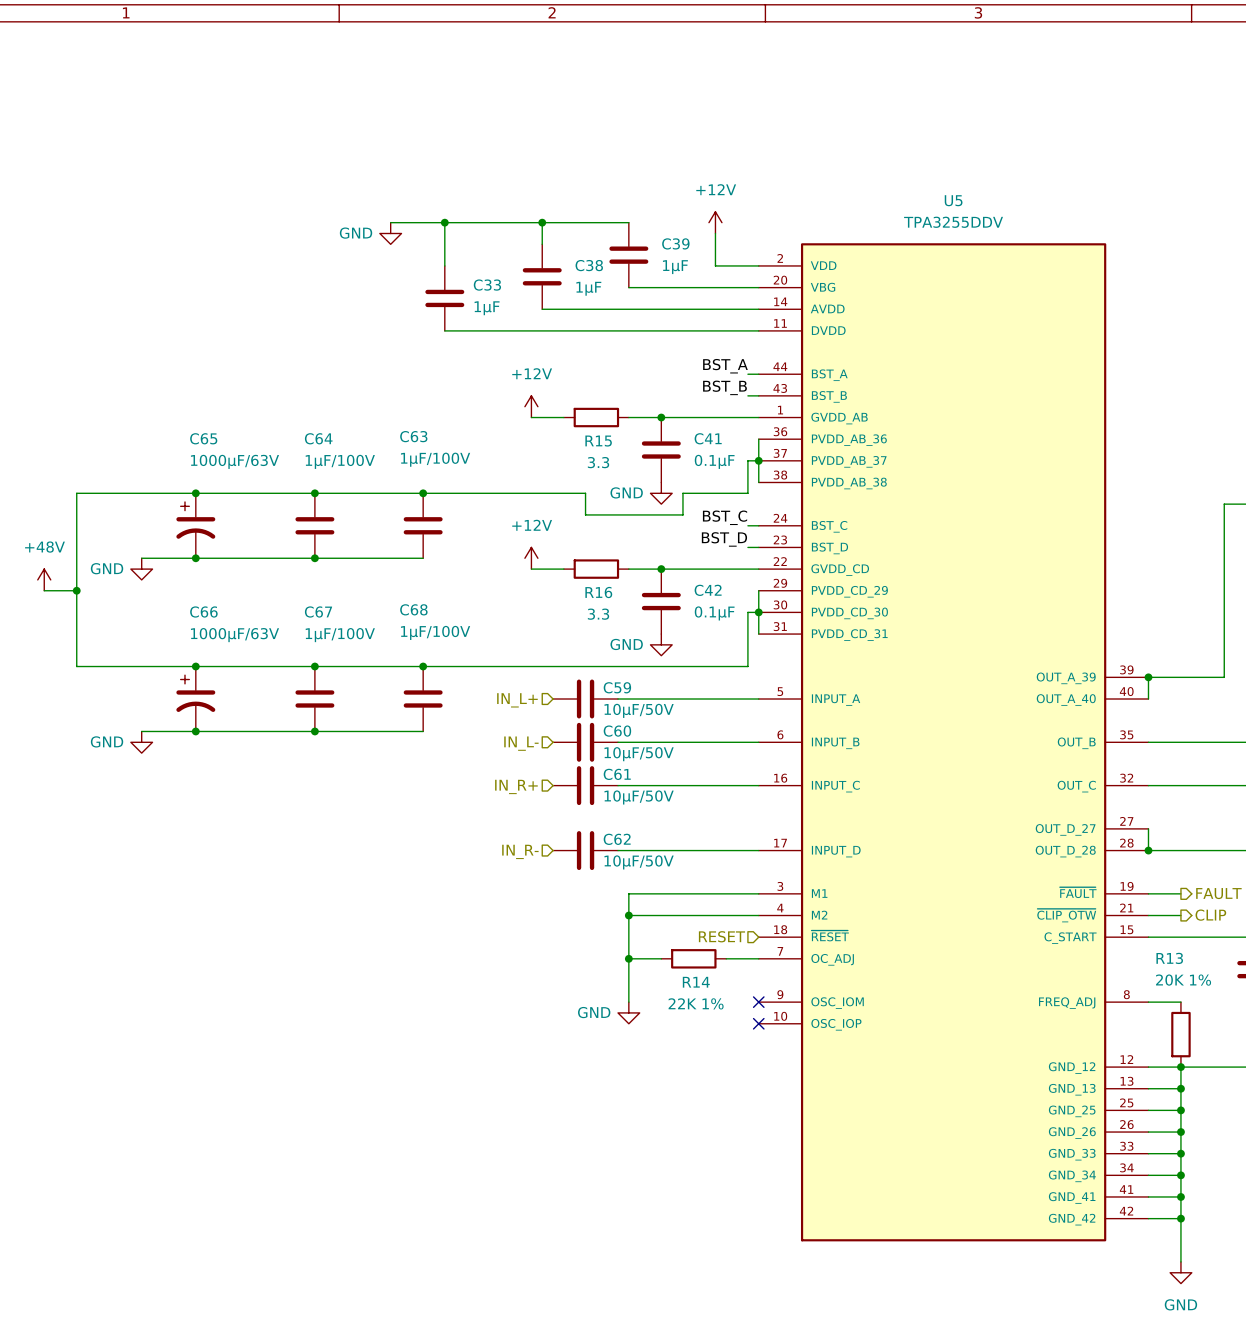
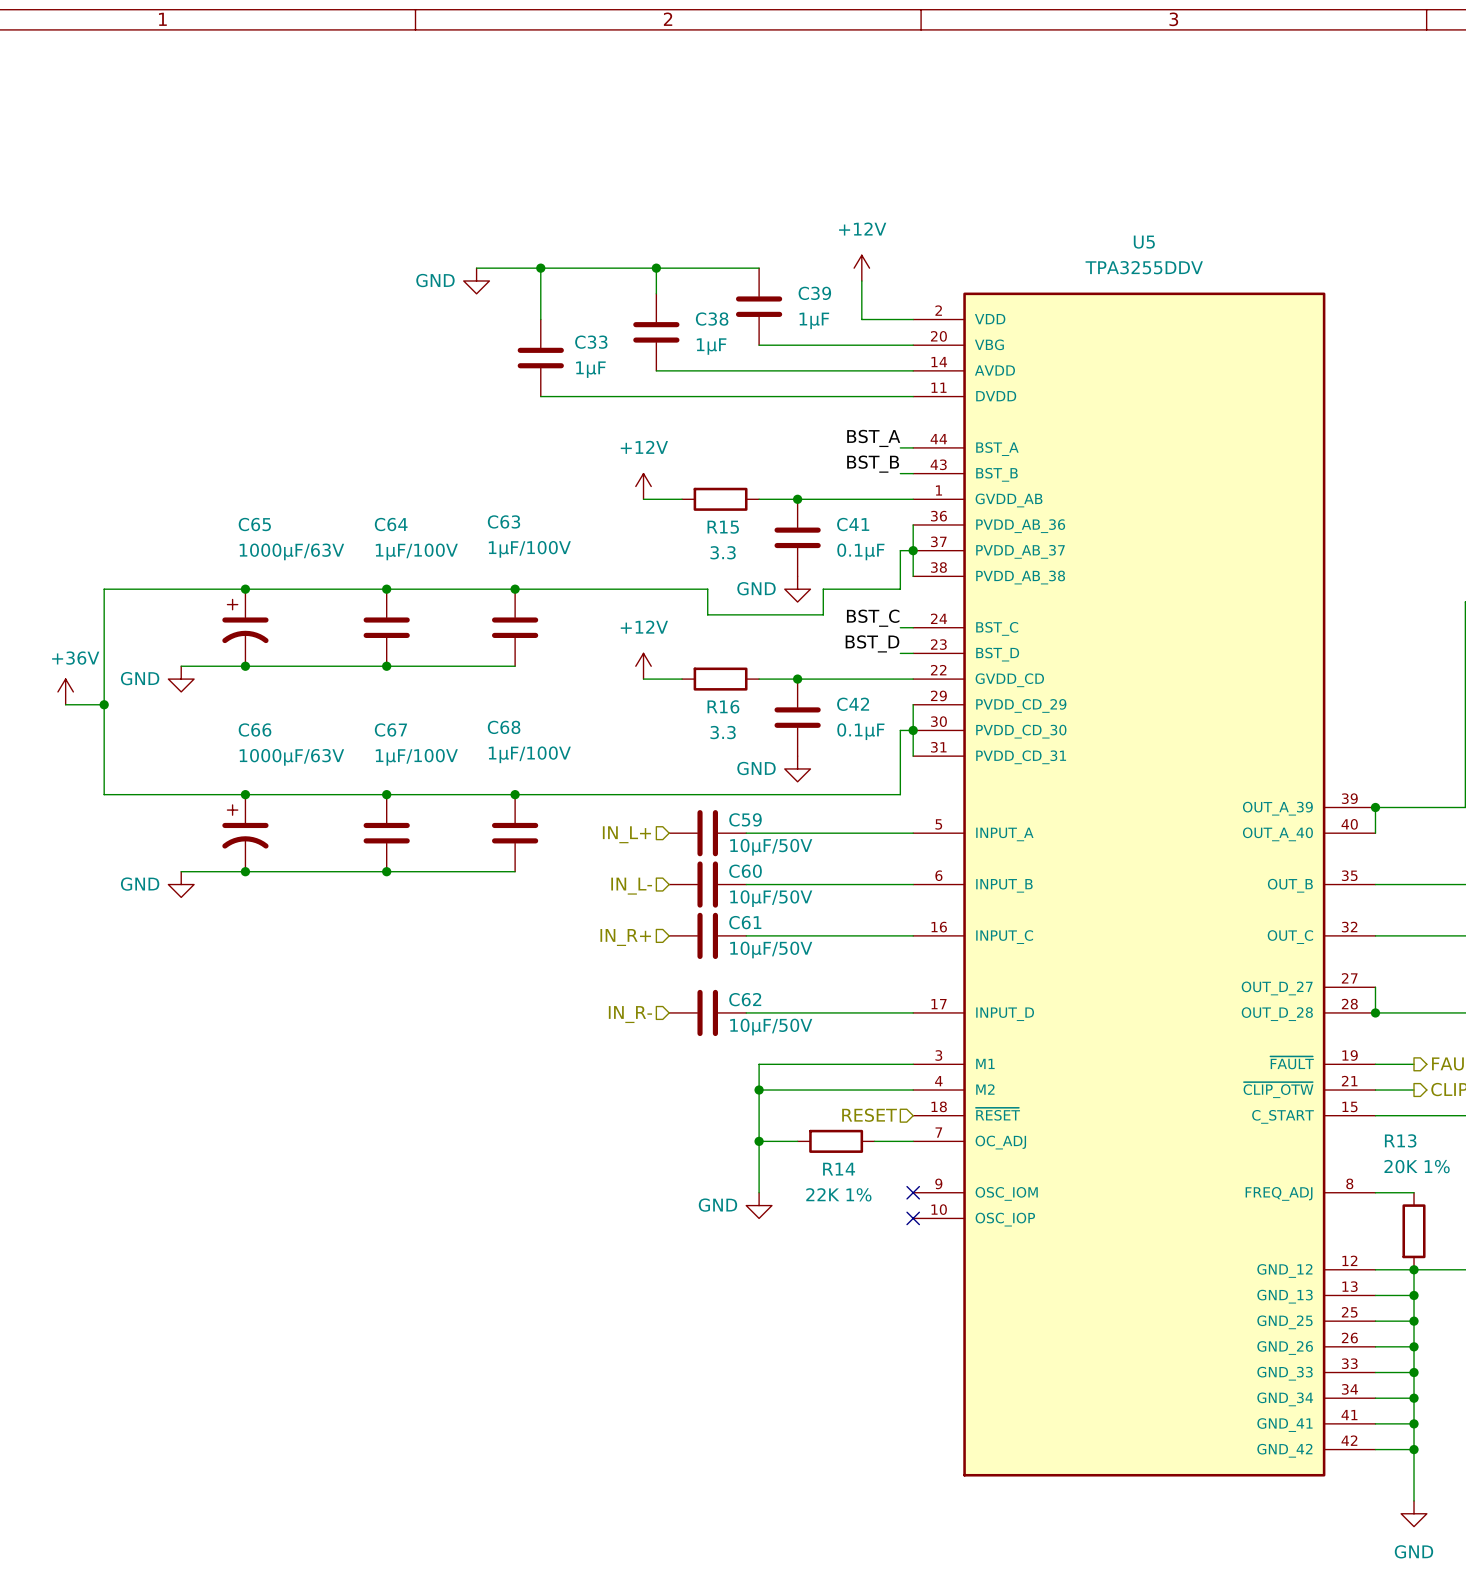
power symbol: +48V (44, 579) -> +36V (65, 691)

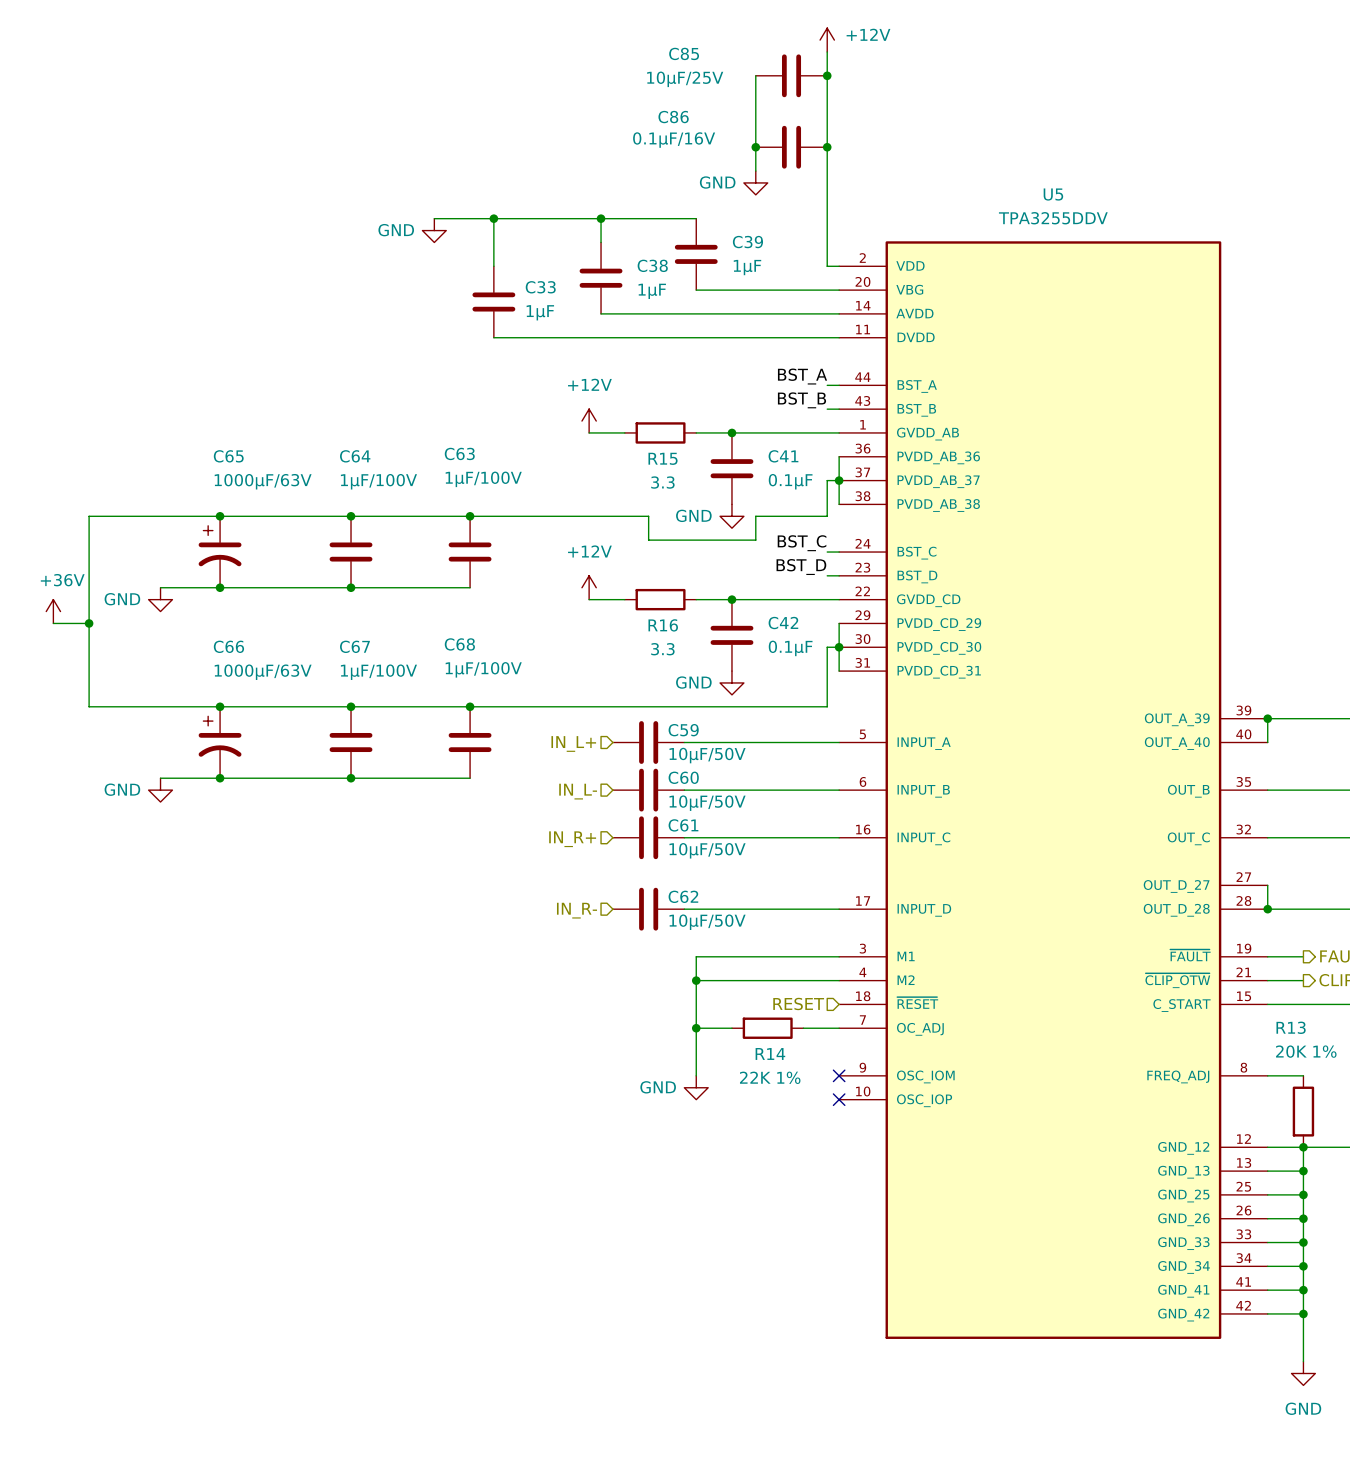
wire: none -> (755, 75) (755, 171)
C85: none -> 10µF/25V (791, 75)
junction: none -> (827, 75)
junction: none -> (755, 147)
C86: none -> 0.1µF/16V (791, 147)
junction: none -> (827, 147)
power symbol: none -> GND (755, 182)
power symbol text position: +12V (862, 229) -> +12V (868, 34)
power symbol position: +12V (861, 268) -> +12V (827, 40)
wire: (861, 280) (861, 319) (900, 319) -> (827, 51) (827, 266)

